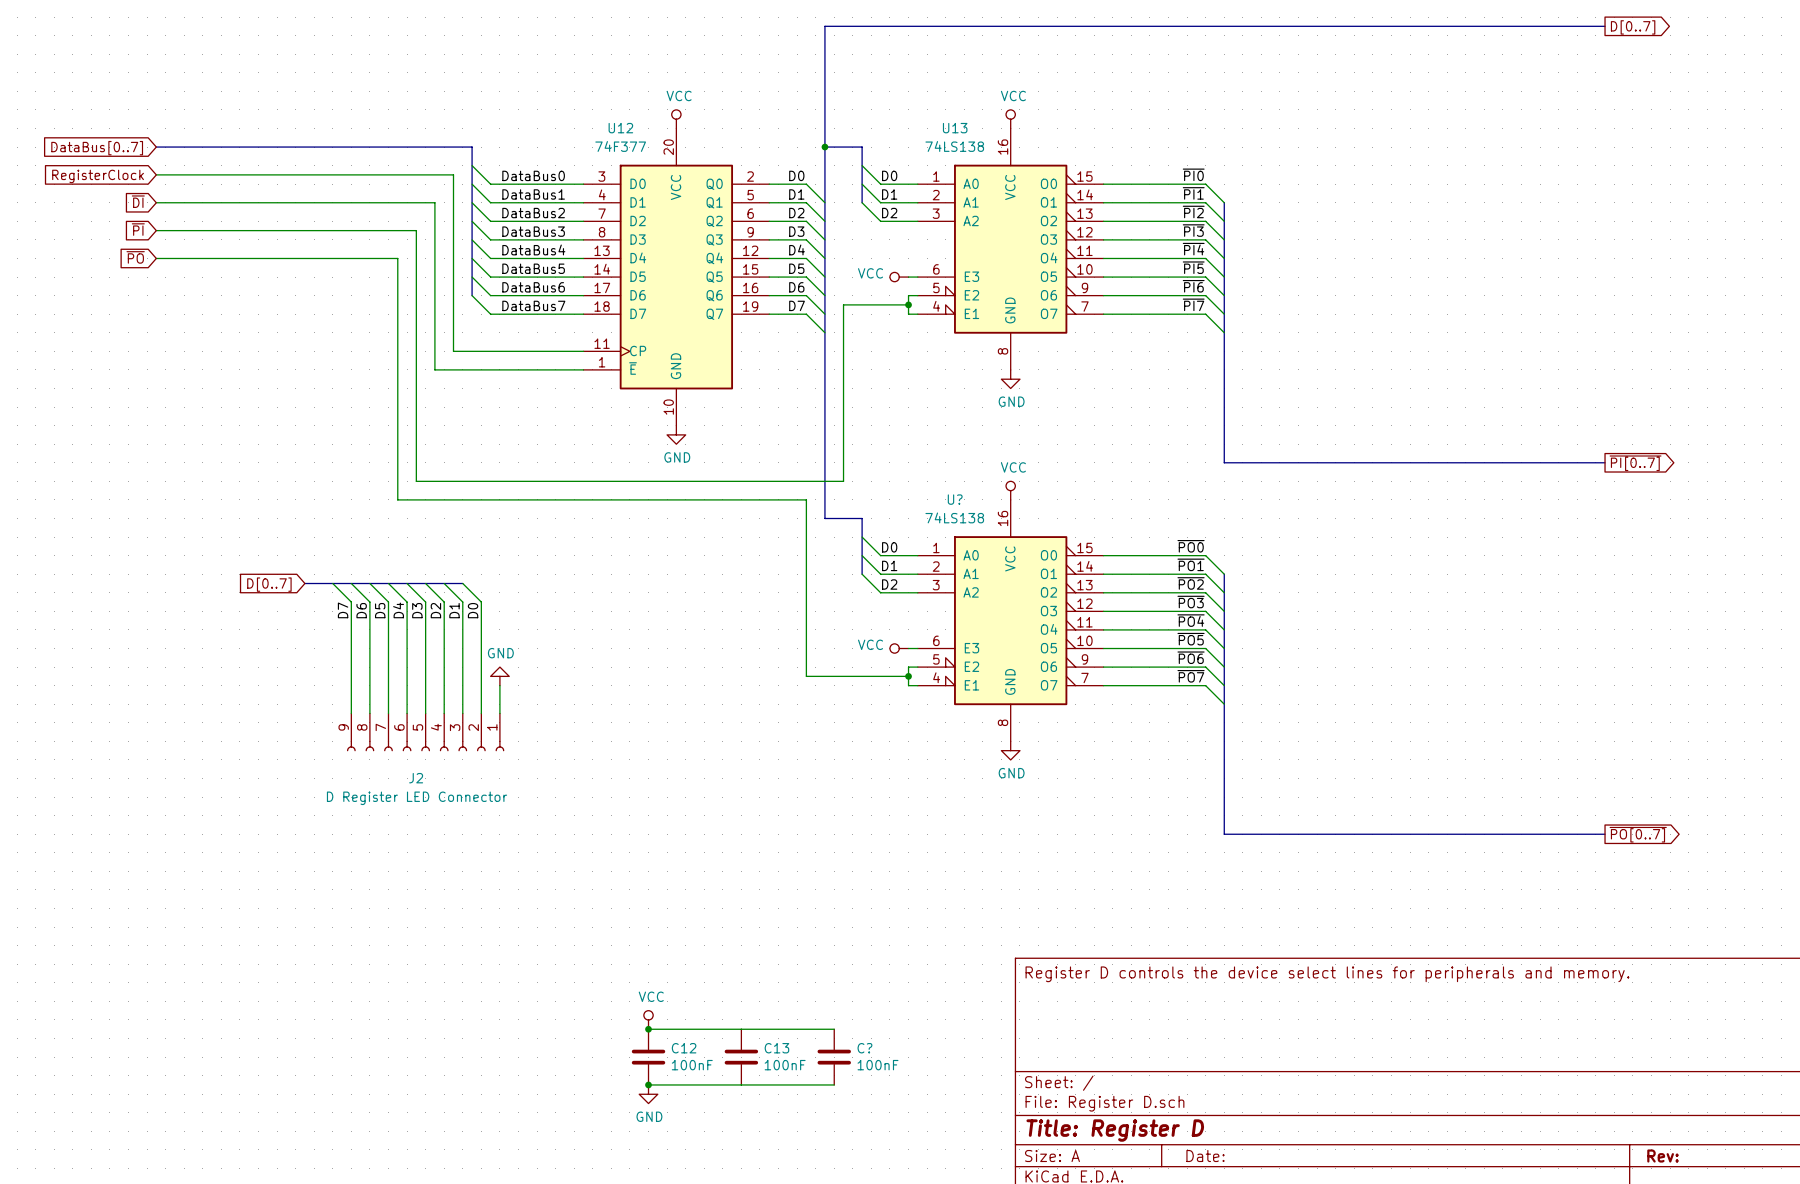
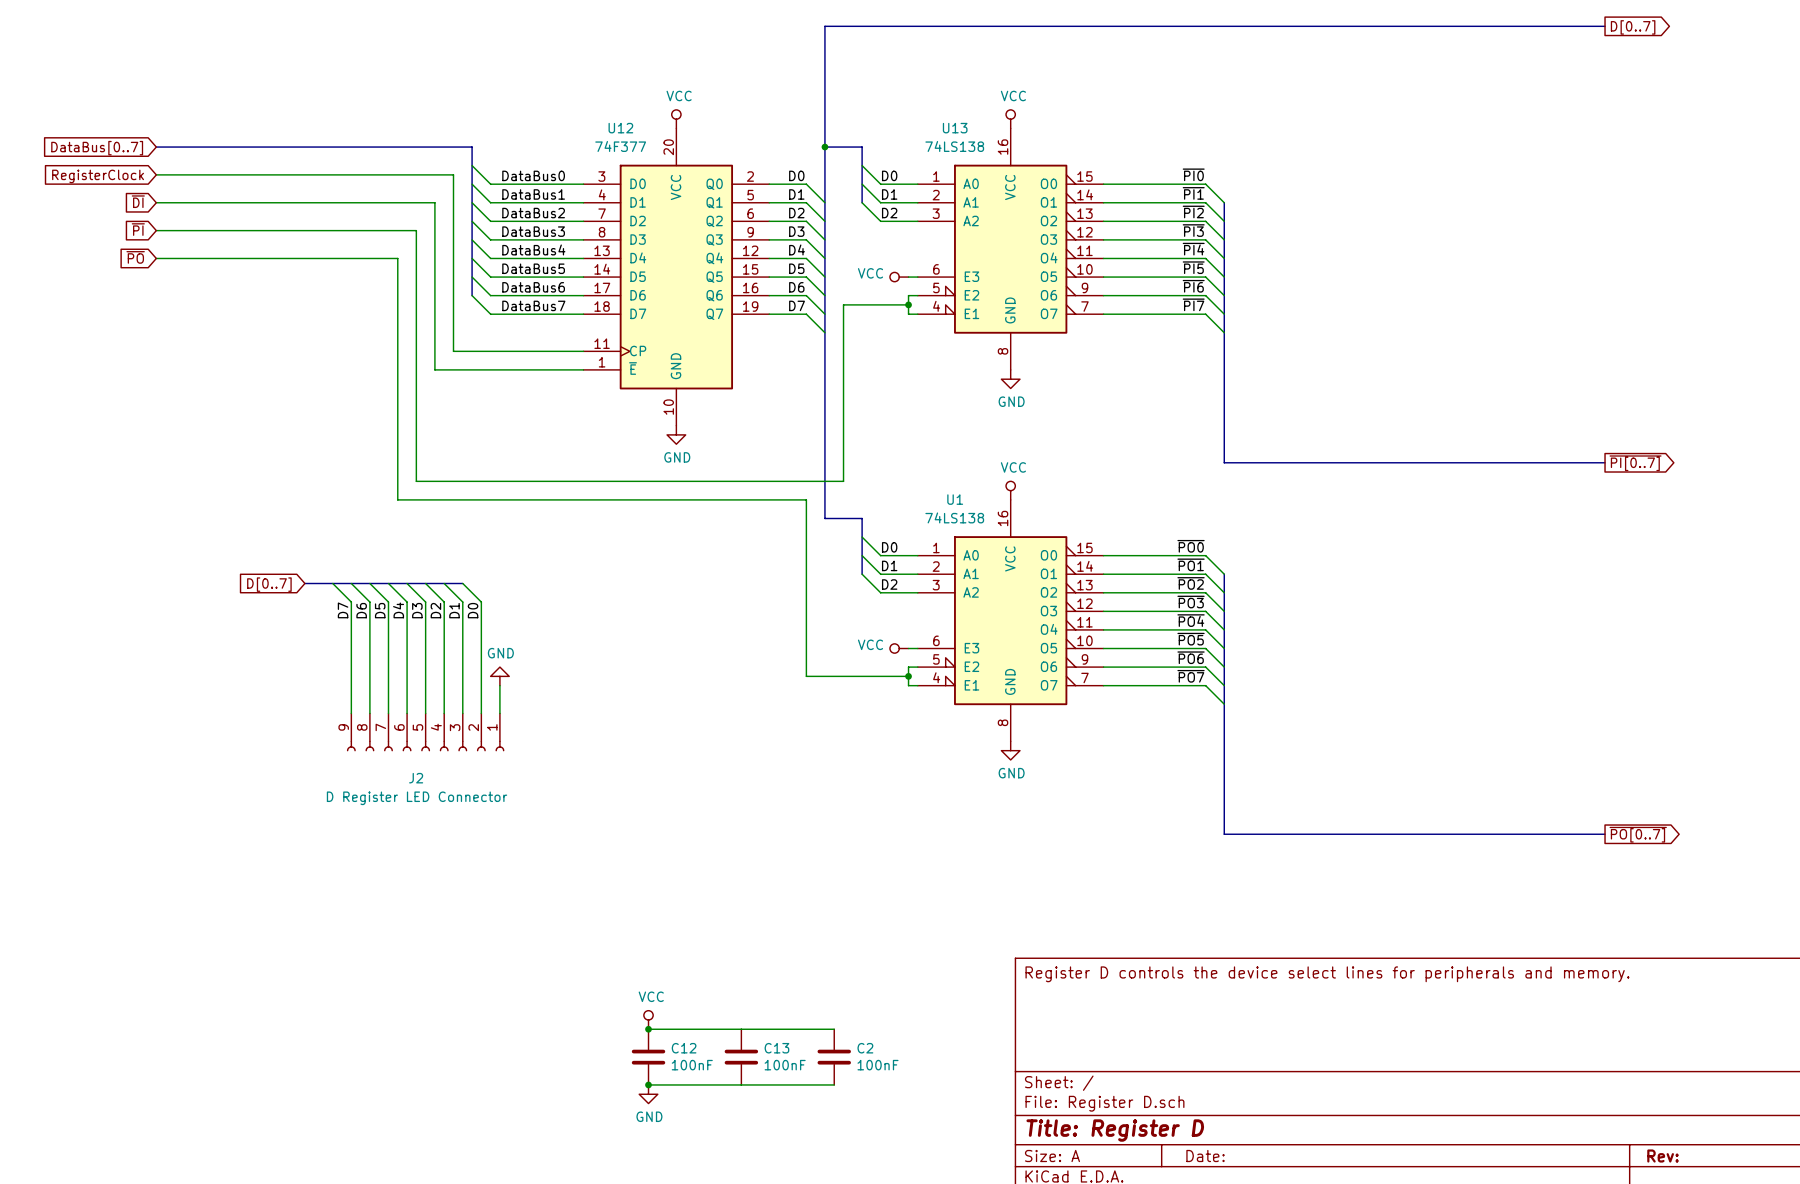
U? name: U? (955, 499) -> U1 (955, 499)
C? name: C? (864, 1048) -> C2 (865, 1048)

